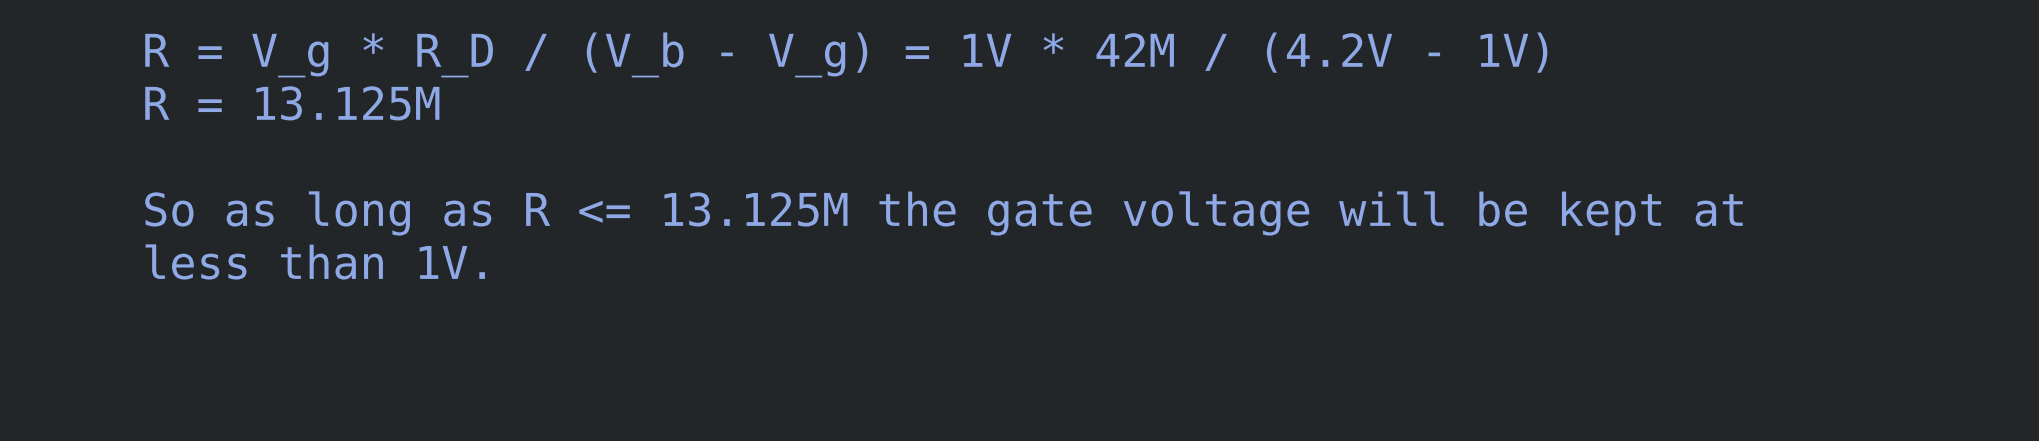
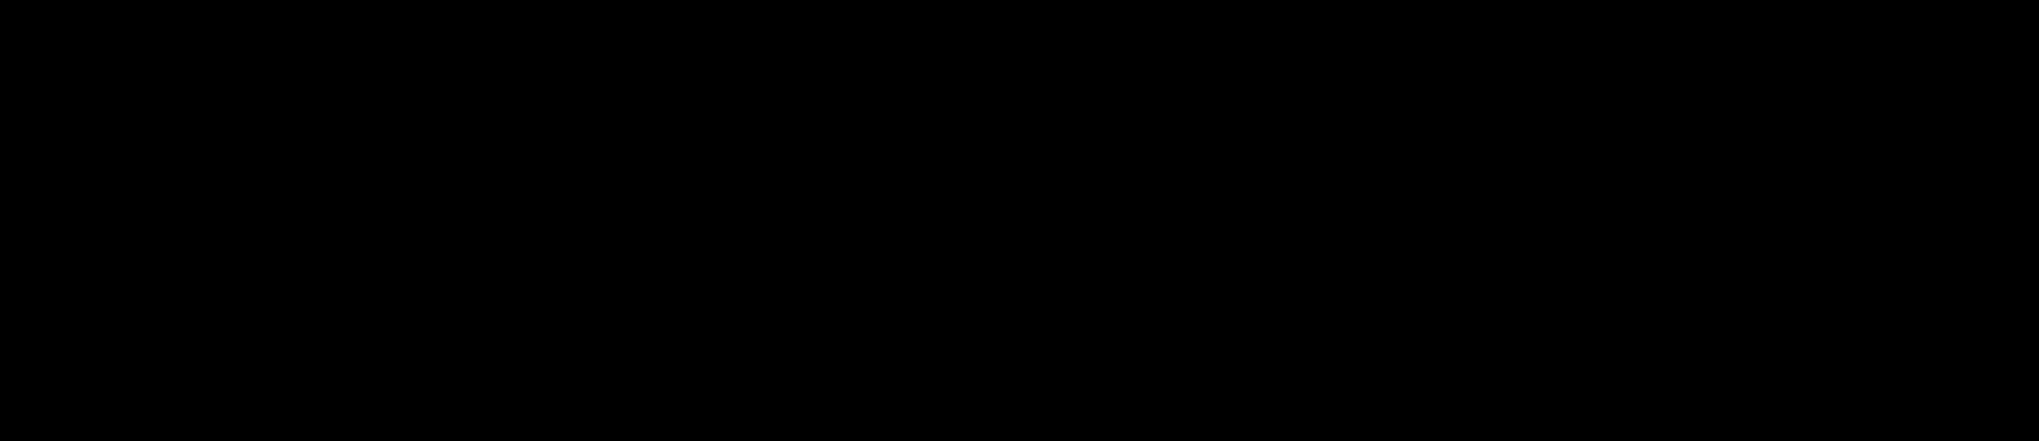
text: R = V_g * R_D / (V_b - V_g) = 1V * 42M / (4.2V - 1V) (846, 54) -> none
text: R = 13.125M (292, 103) -> none
text: So as long as R <= 13.125M the gate voltage will be kept at (943, 213) -> none
text: less than 1V. (315, 261) -> none

